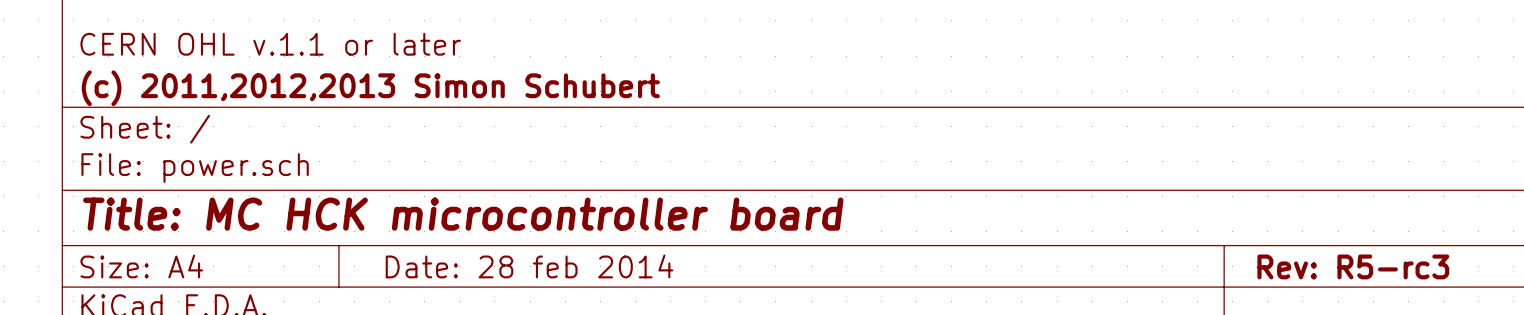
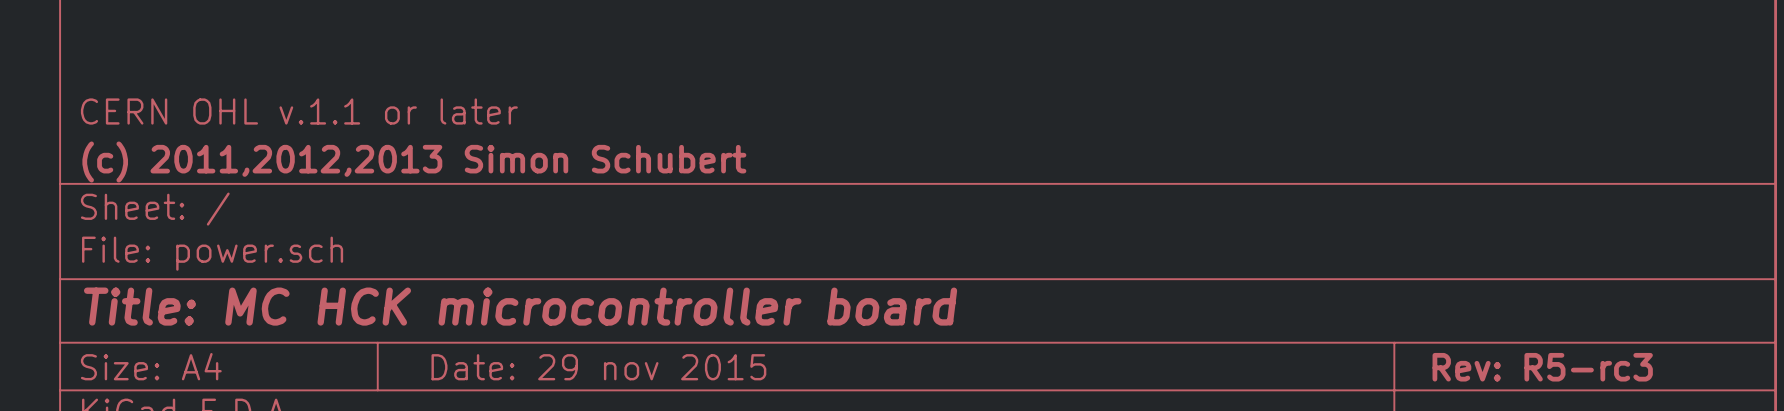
title block: Date: 28 feb 2014 (529, 266) -> Date: 29 nov 2015 (598, 367)

